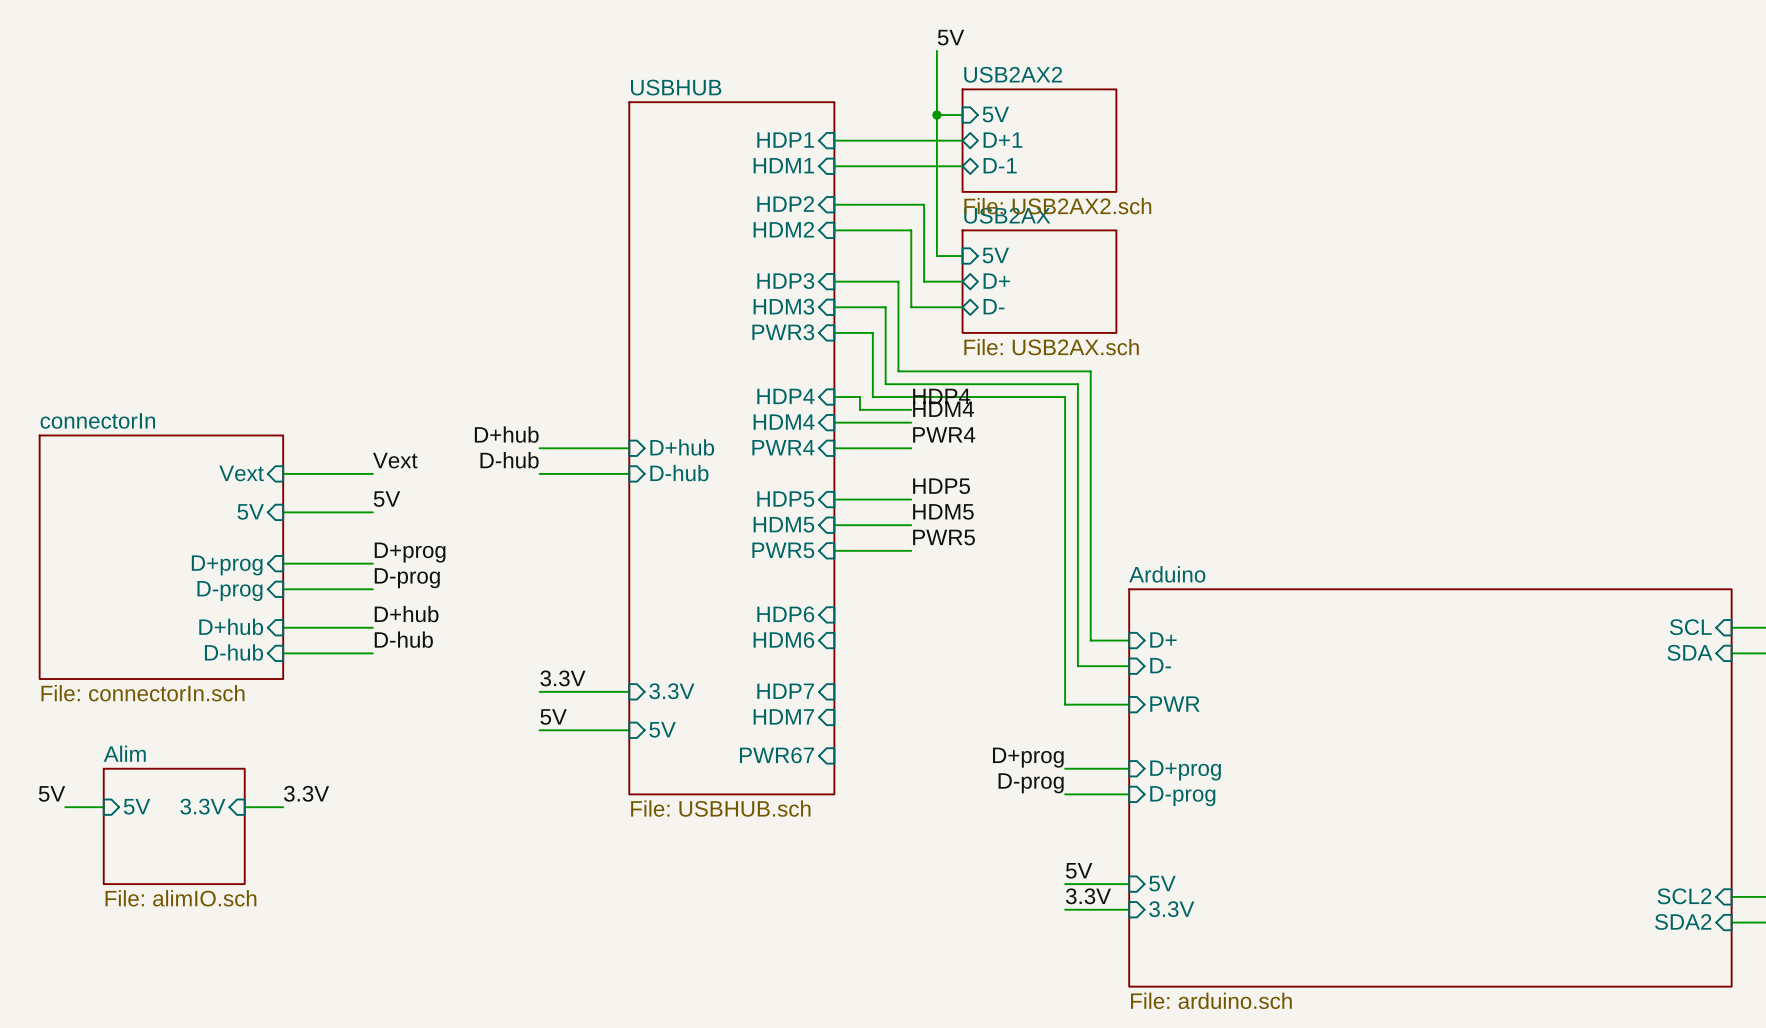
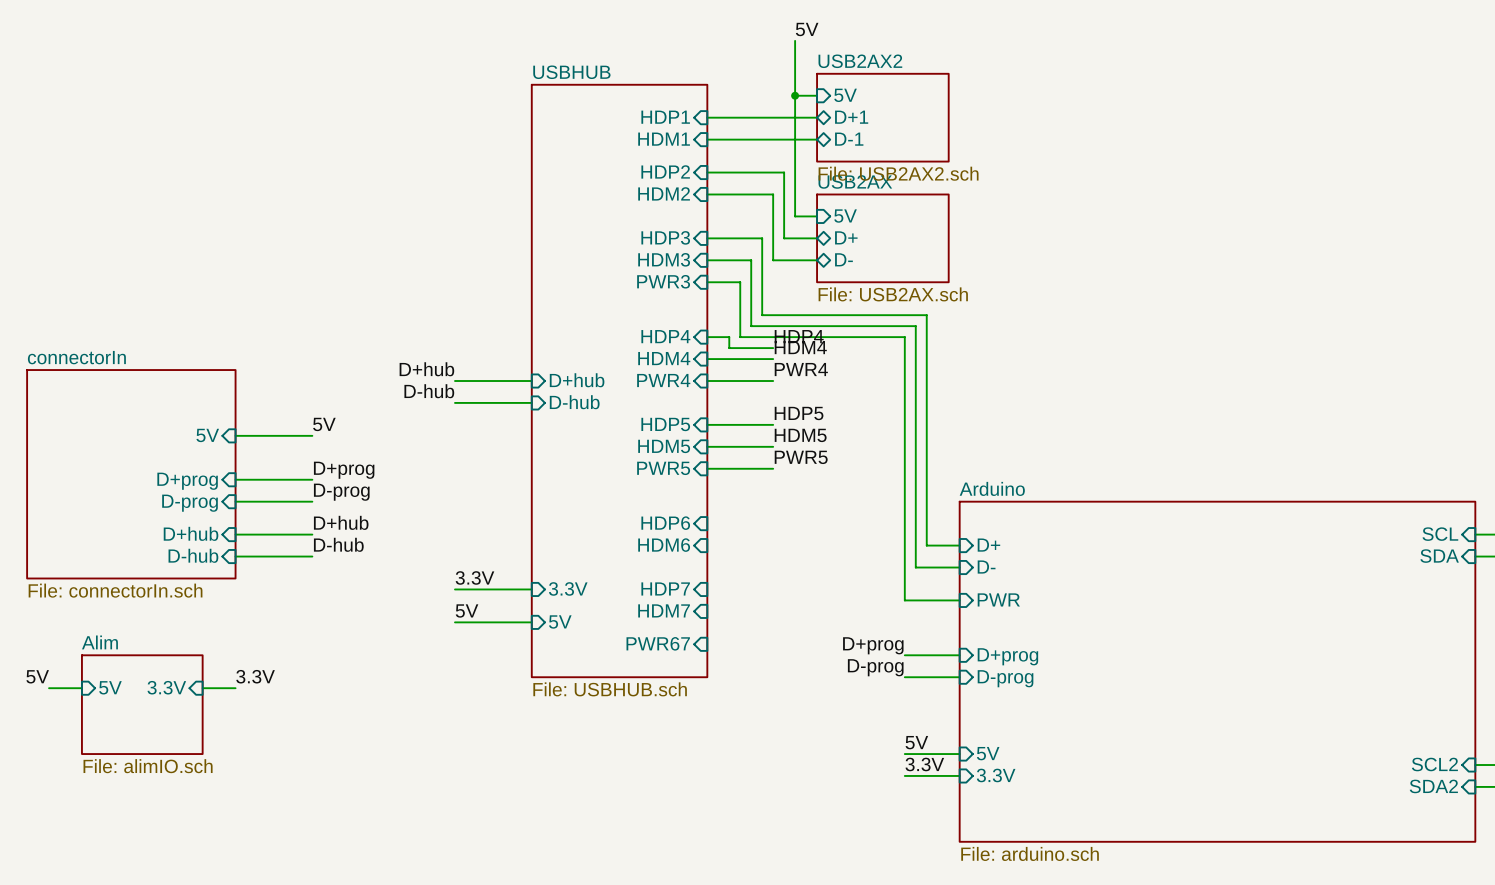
label: Vext (395, 460) -> none
sheet pin: Vext (241, 473) -> none
wire: (283, 473) (372, 473) -> none

